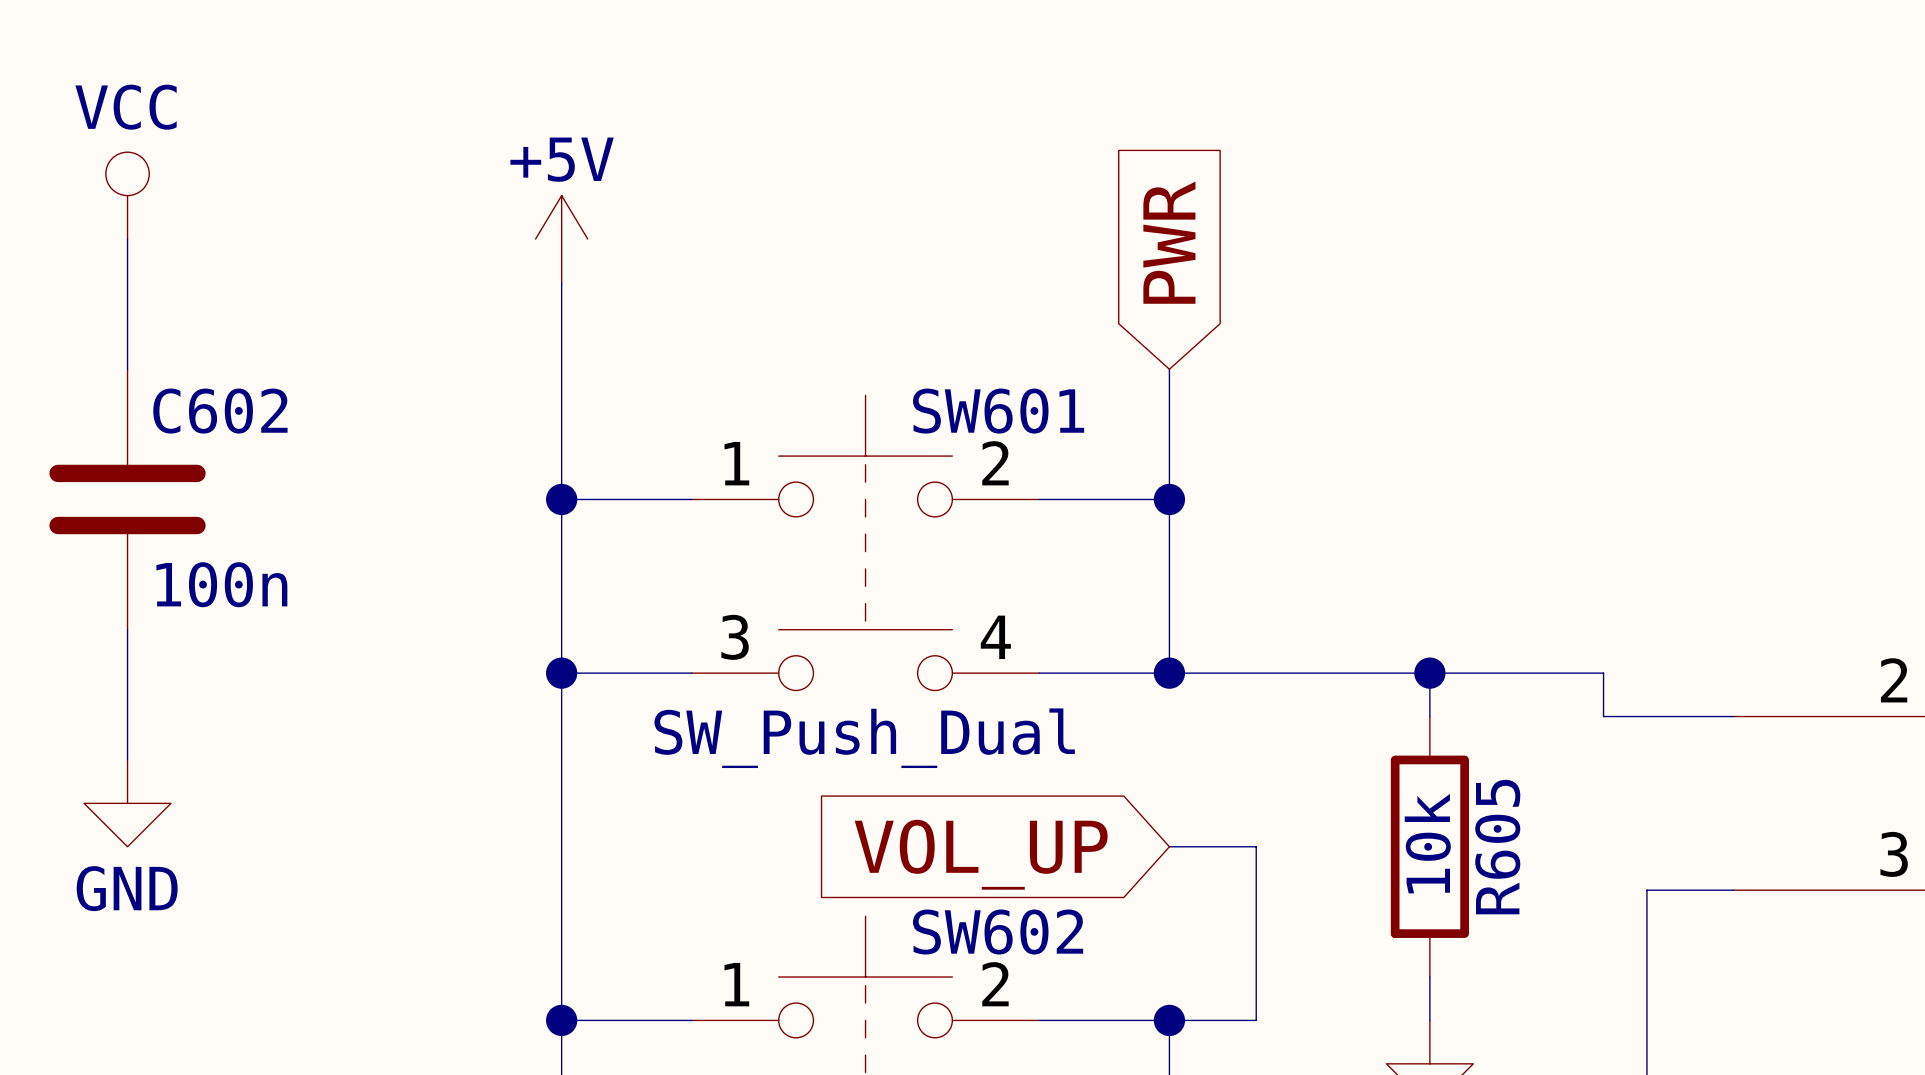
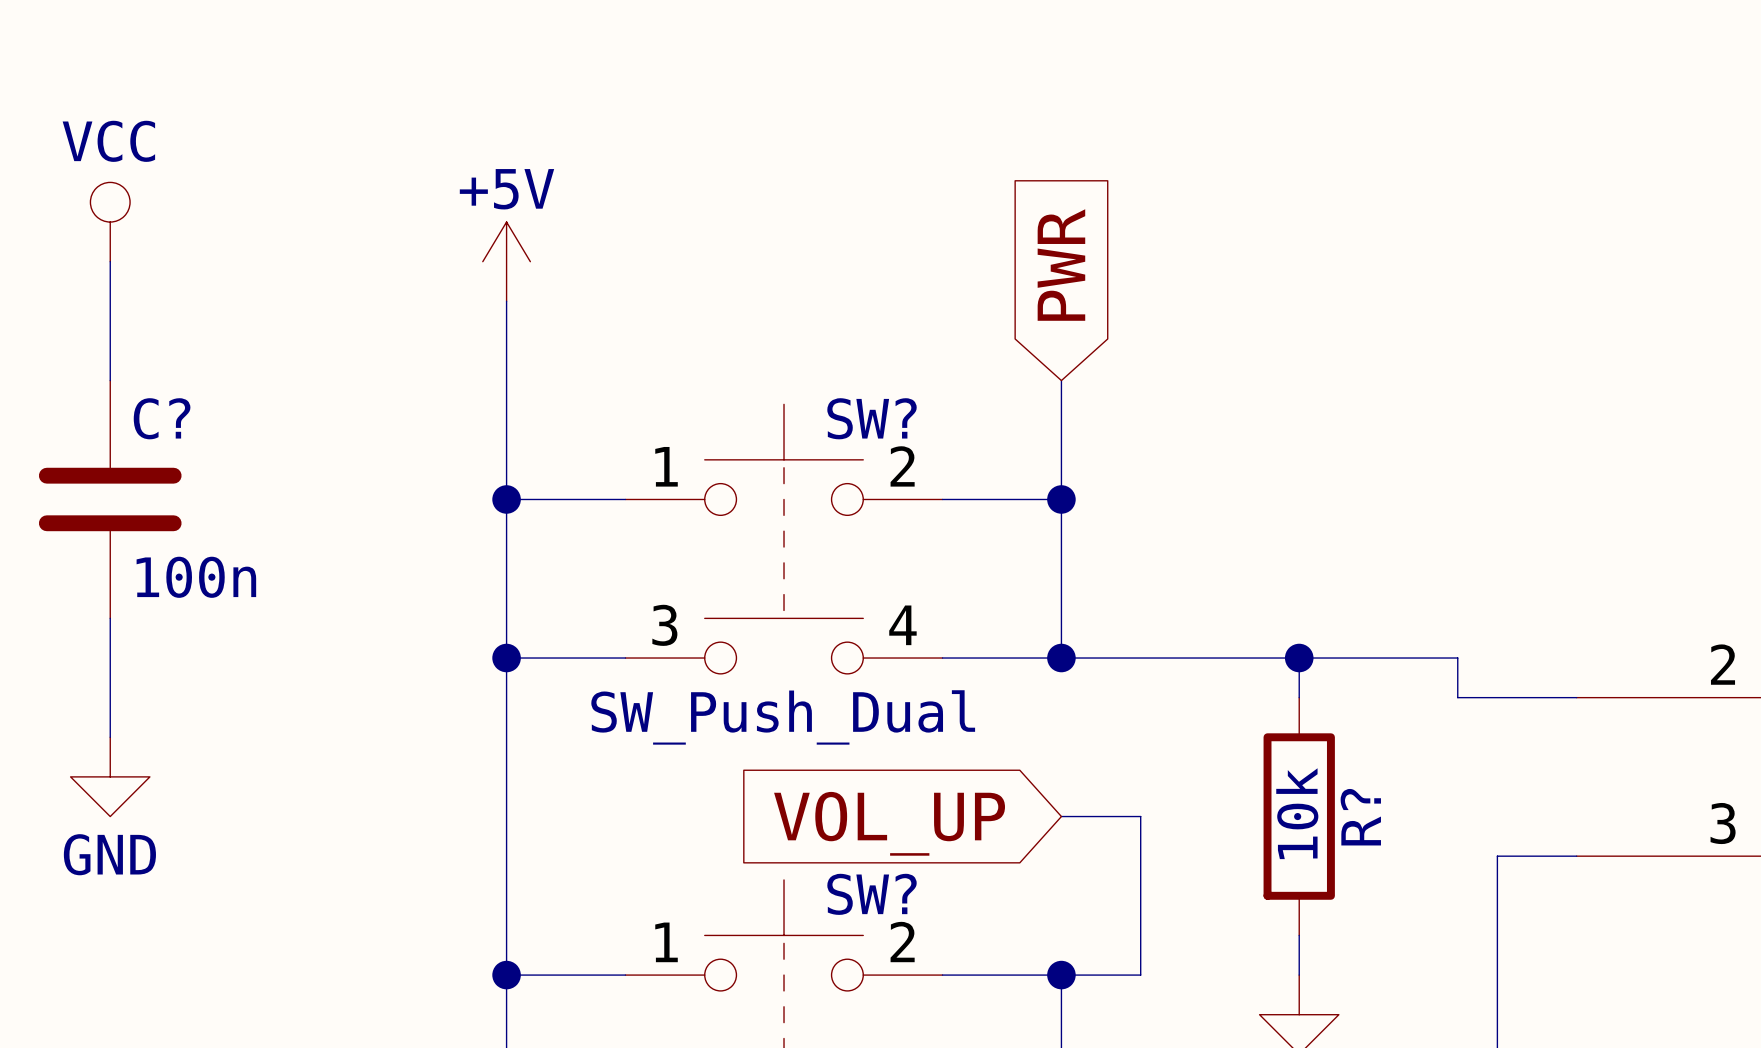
C602 name: C602 (220, 411) -> C? (162, 418)
SW601 name: SW601 (998, 411) -> SW? (872, 418)
R605 name: R605 (1497, 847) -> R? (1360, 817)
SW602 name: SW602 (998, 932) -> SW? (872, 894)

